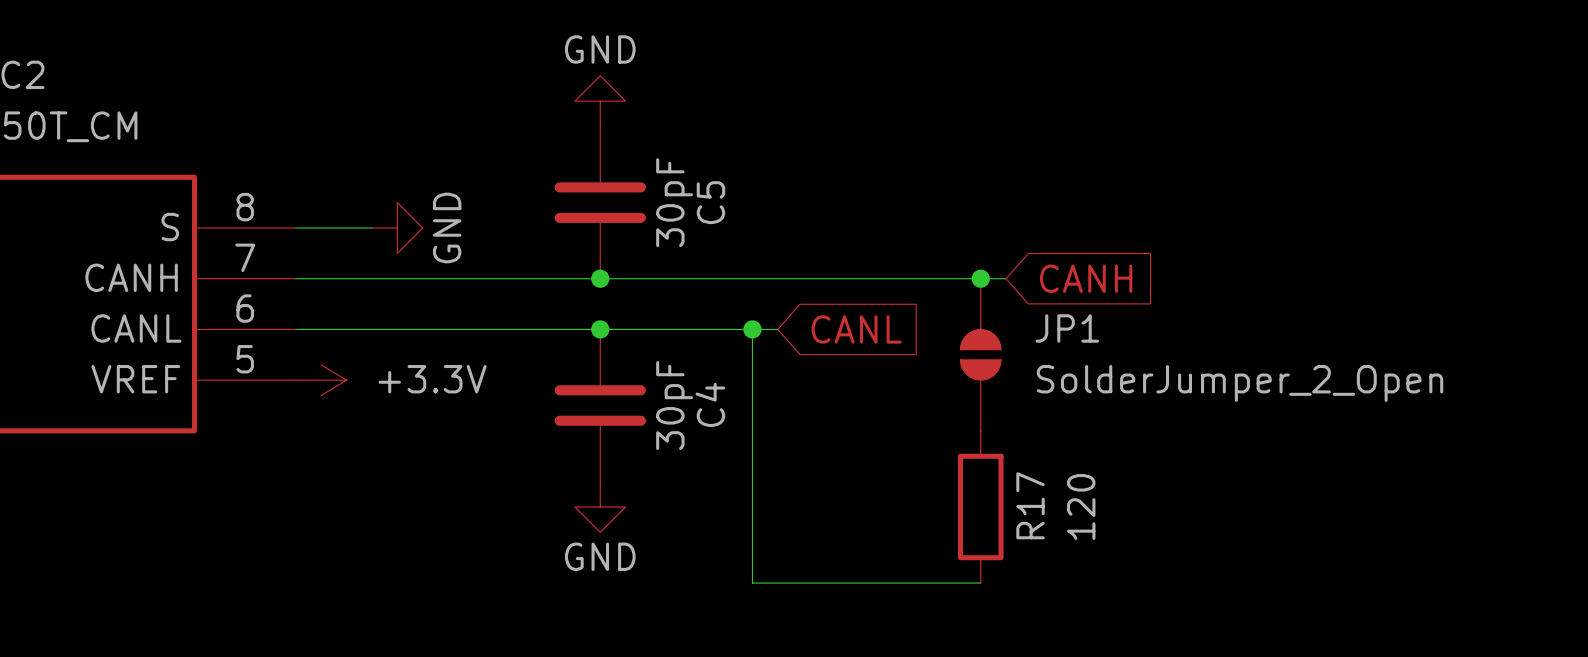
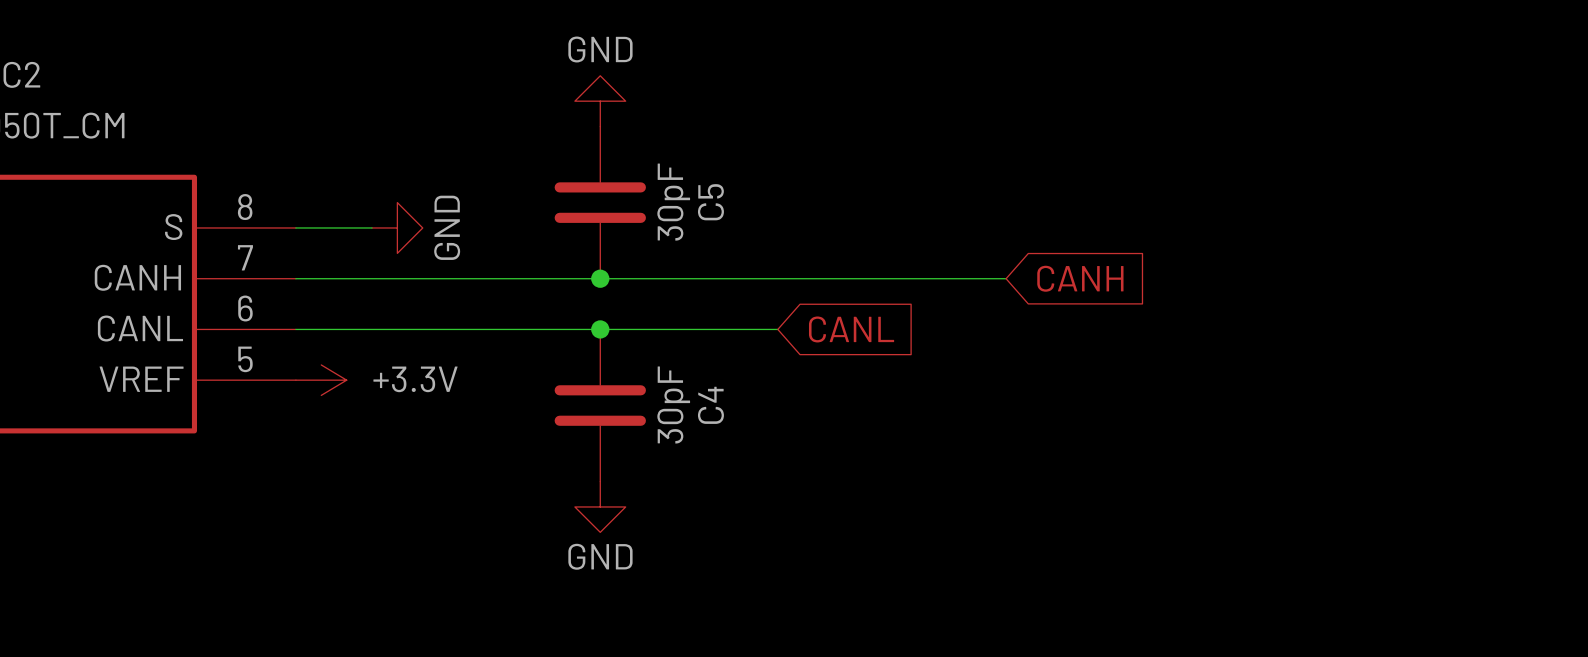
junction: (980, 278) -> none
wire: (752, 329) (752, 583) (980, 583) -> none
junction: (752, 329) -> none
JP1: SolderJumper_2_Open (980, 354) -> none
R17: 120 (980, 506) -> none

